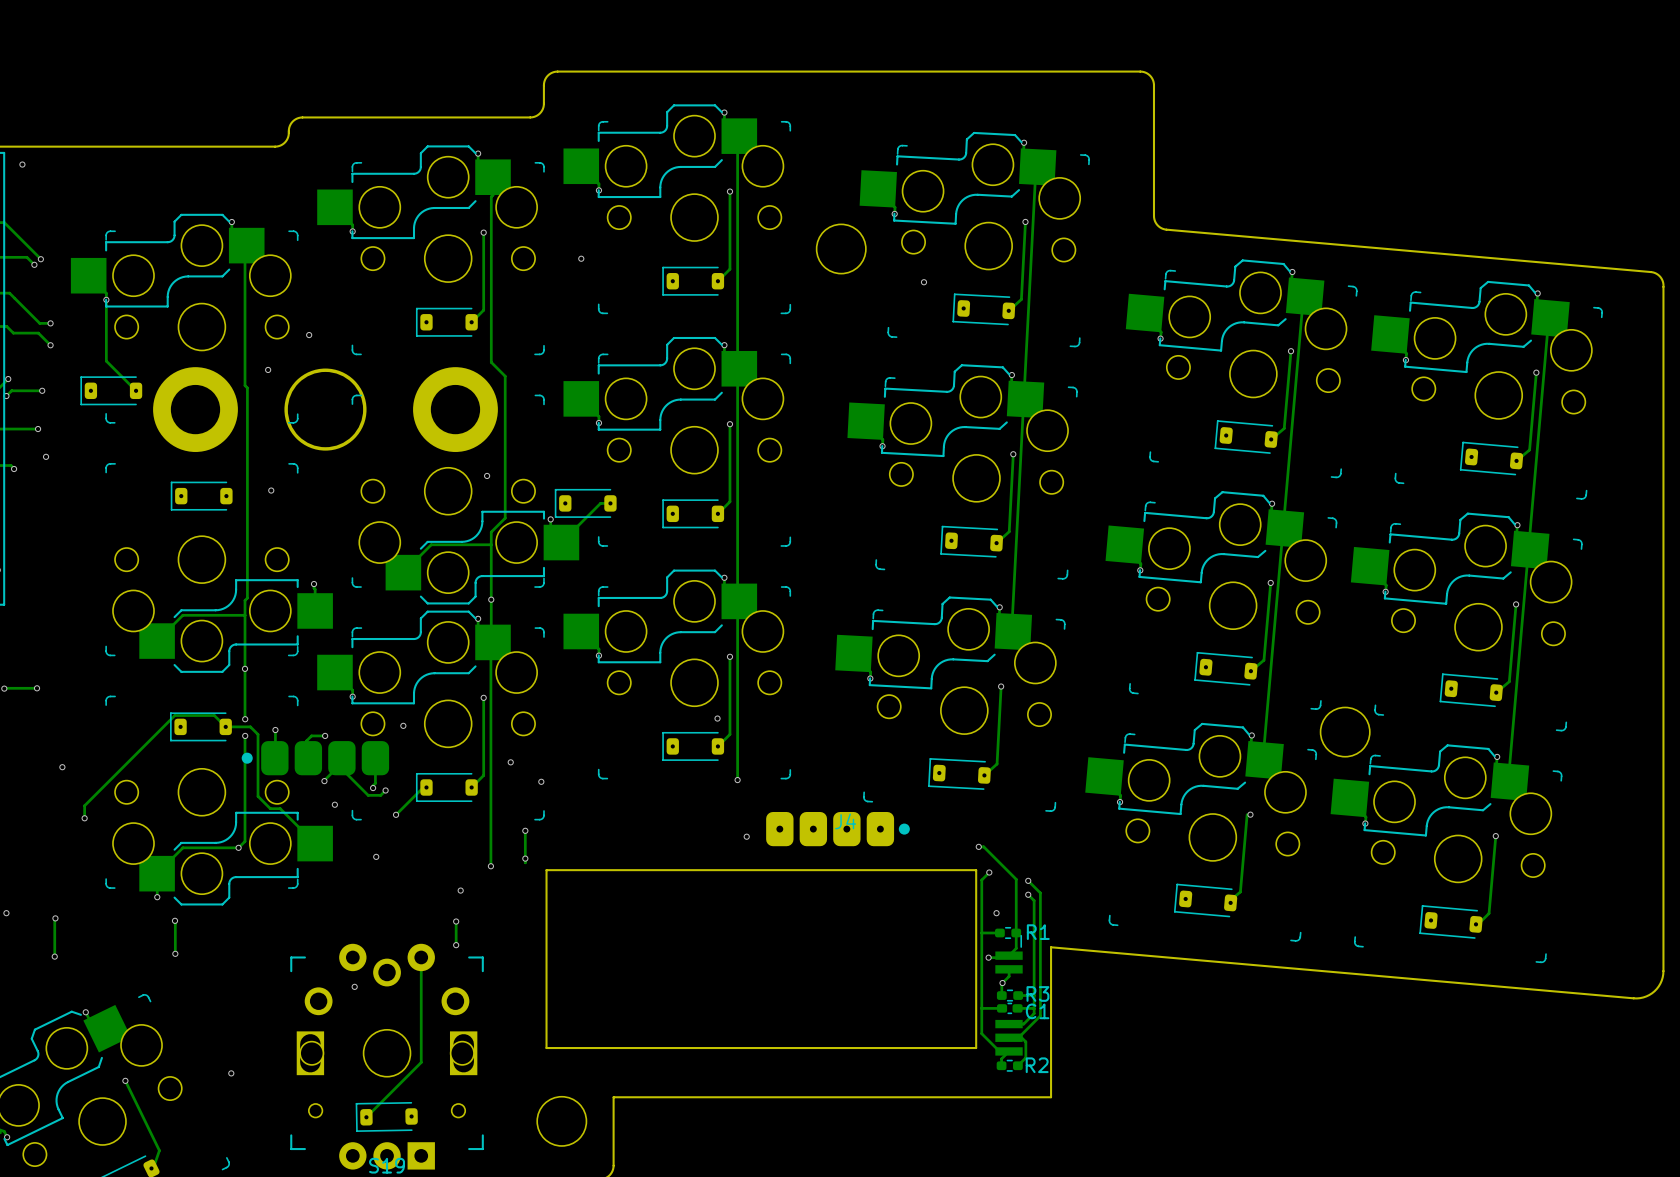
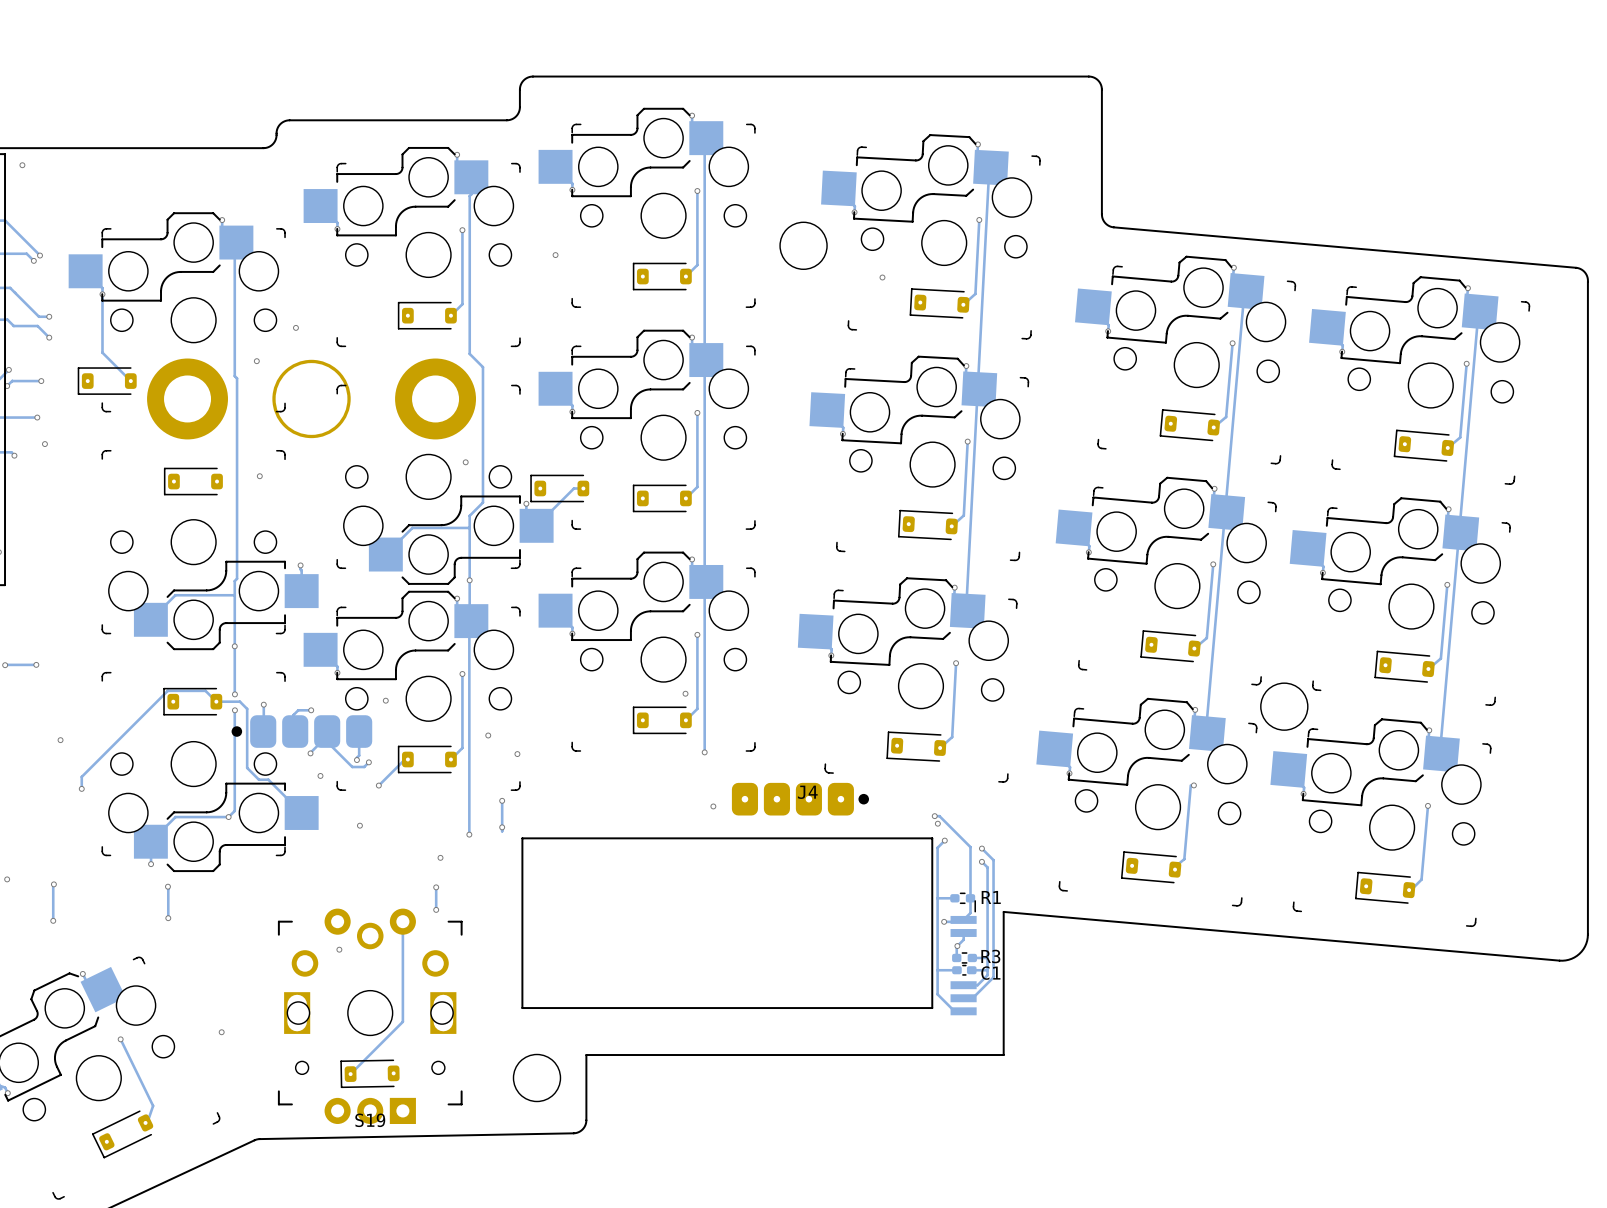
via position: (996, 913) -> (937, 823)
track: (1009, 1037) (1021, 1037) (1025, 1041) (1025, 1057) (1017, 1065) -> none
track: (1009, 1051) (1001, 1058) (1001, 1065) -> none
R2: (1009, 1065) -> none

